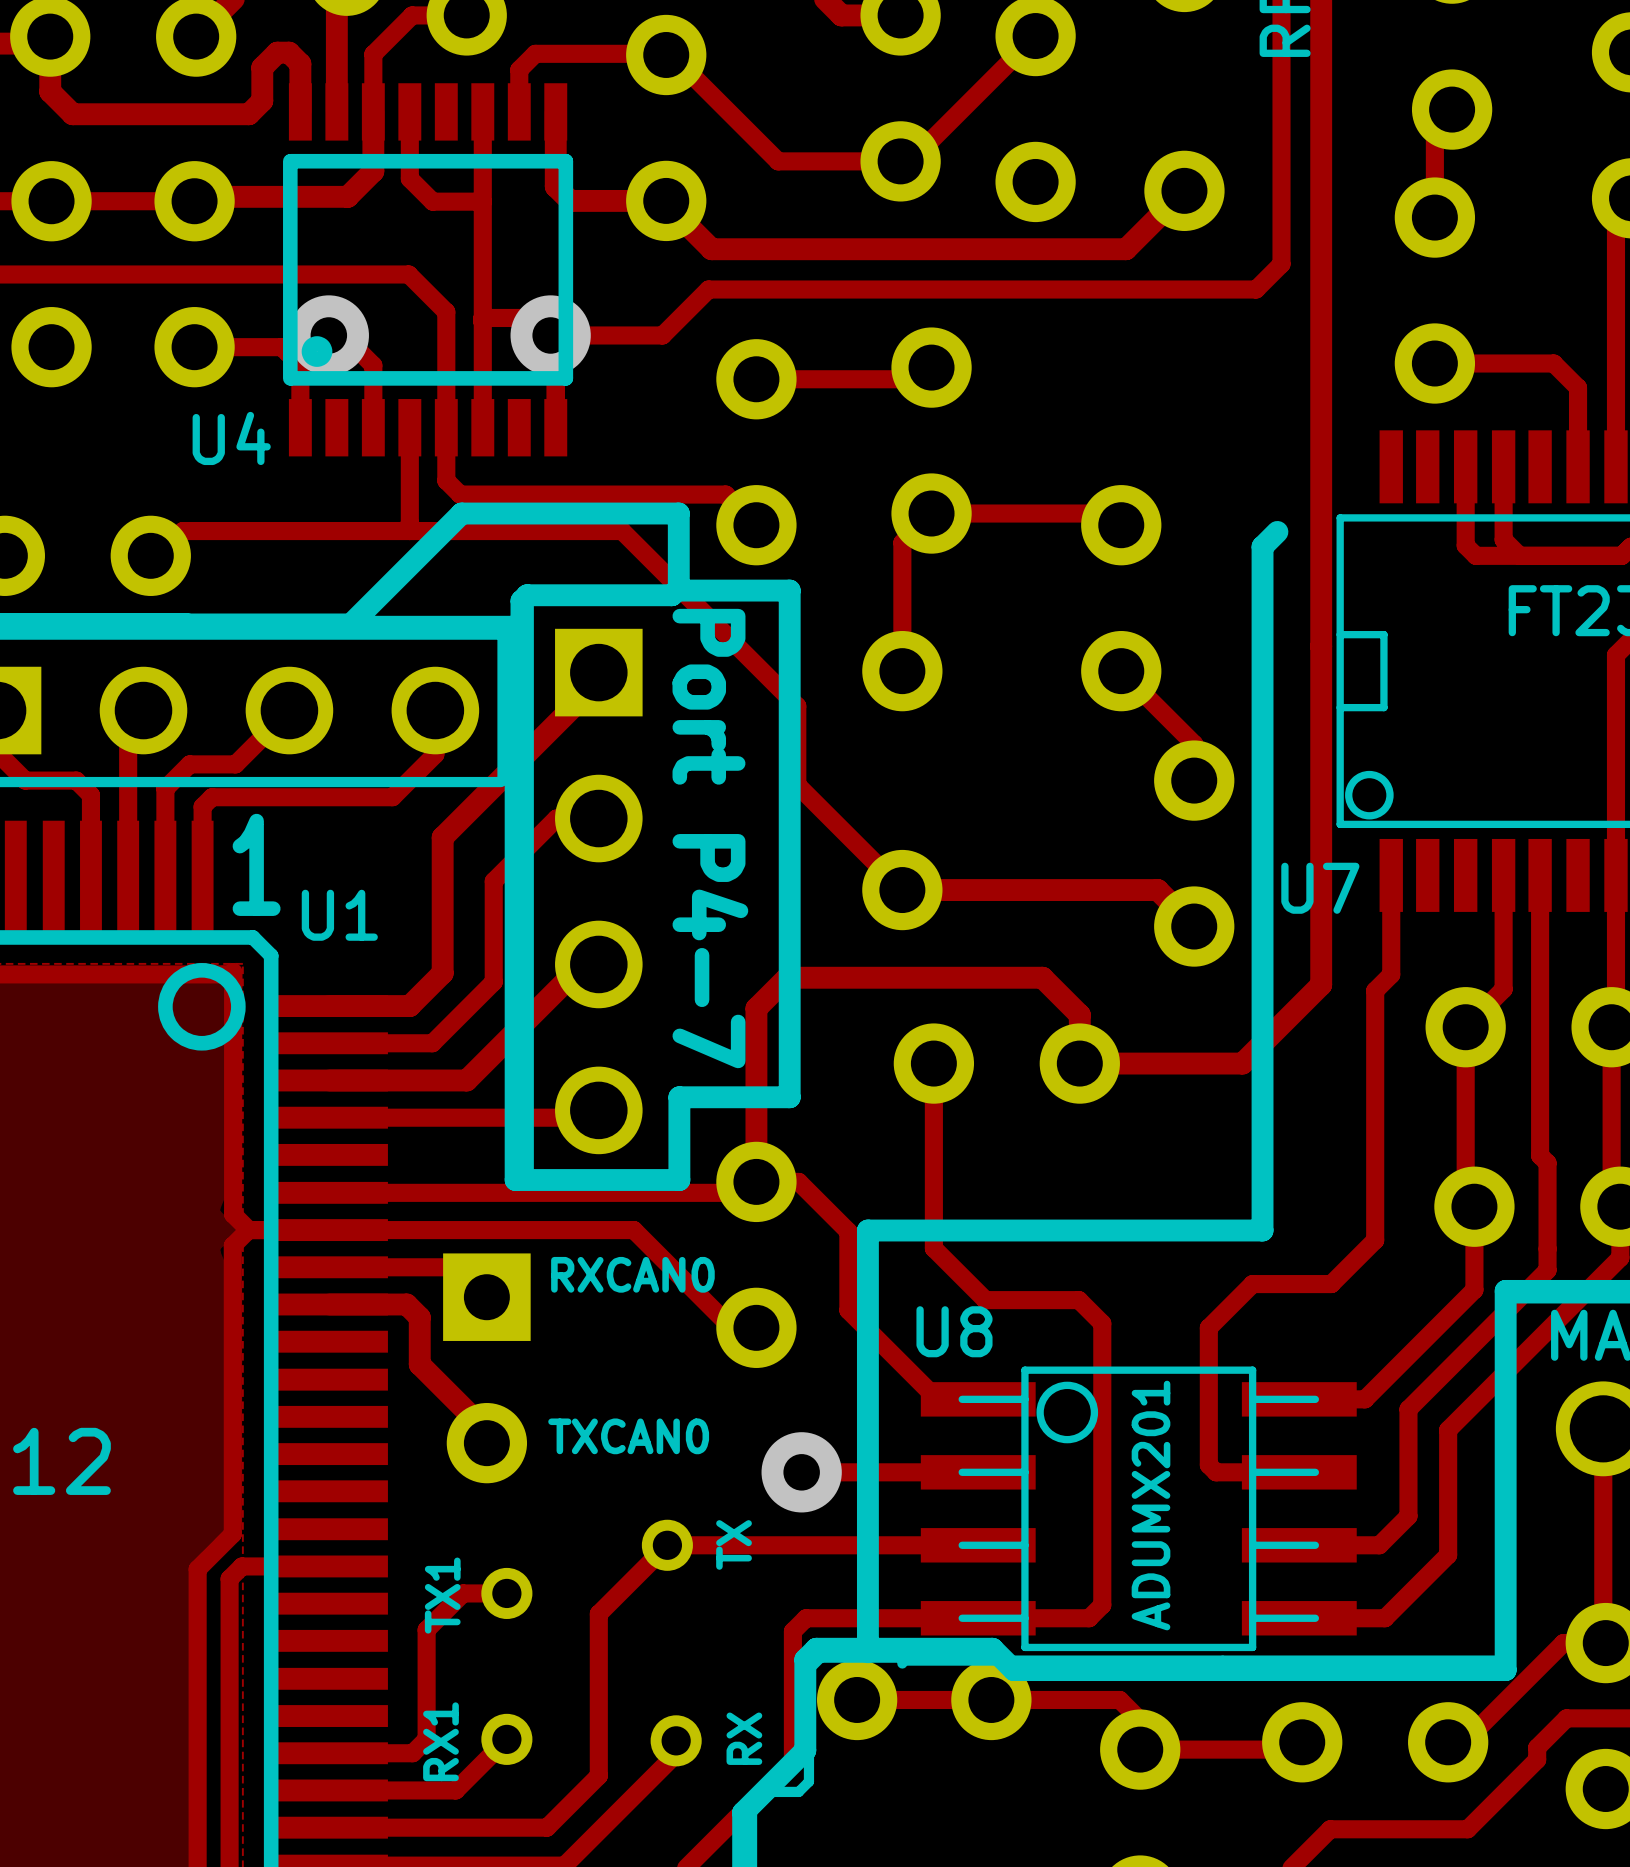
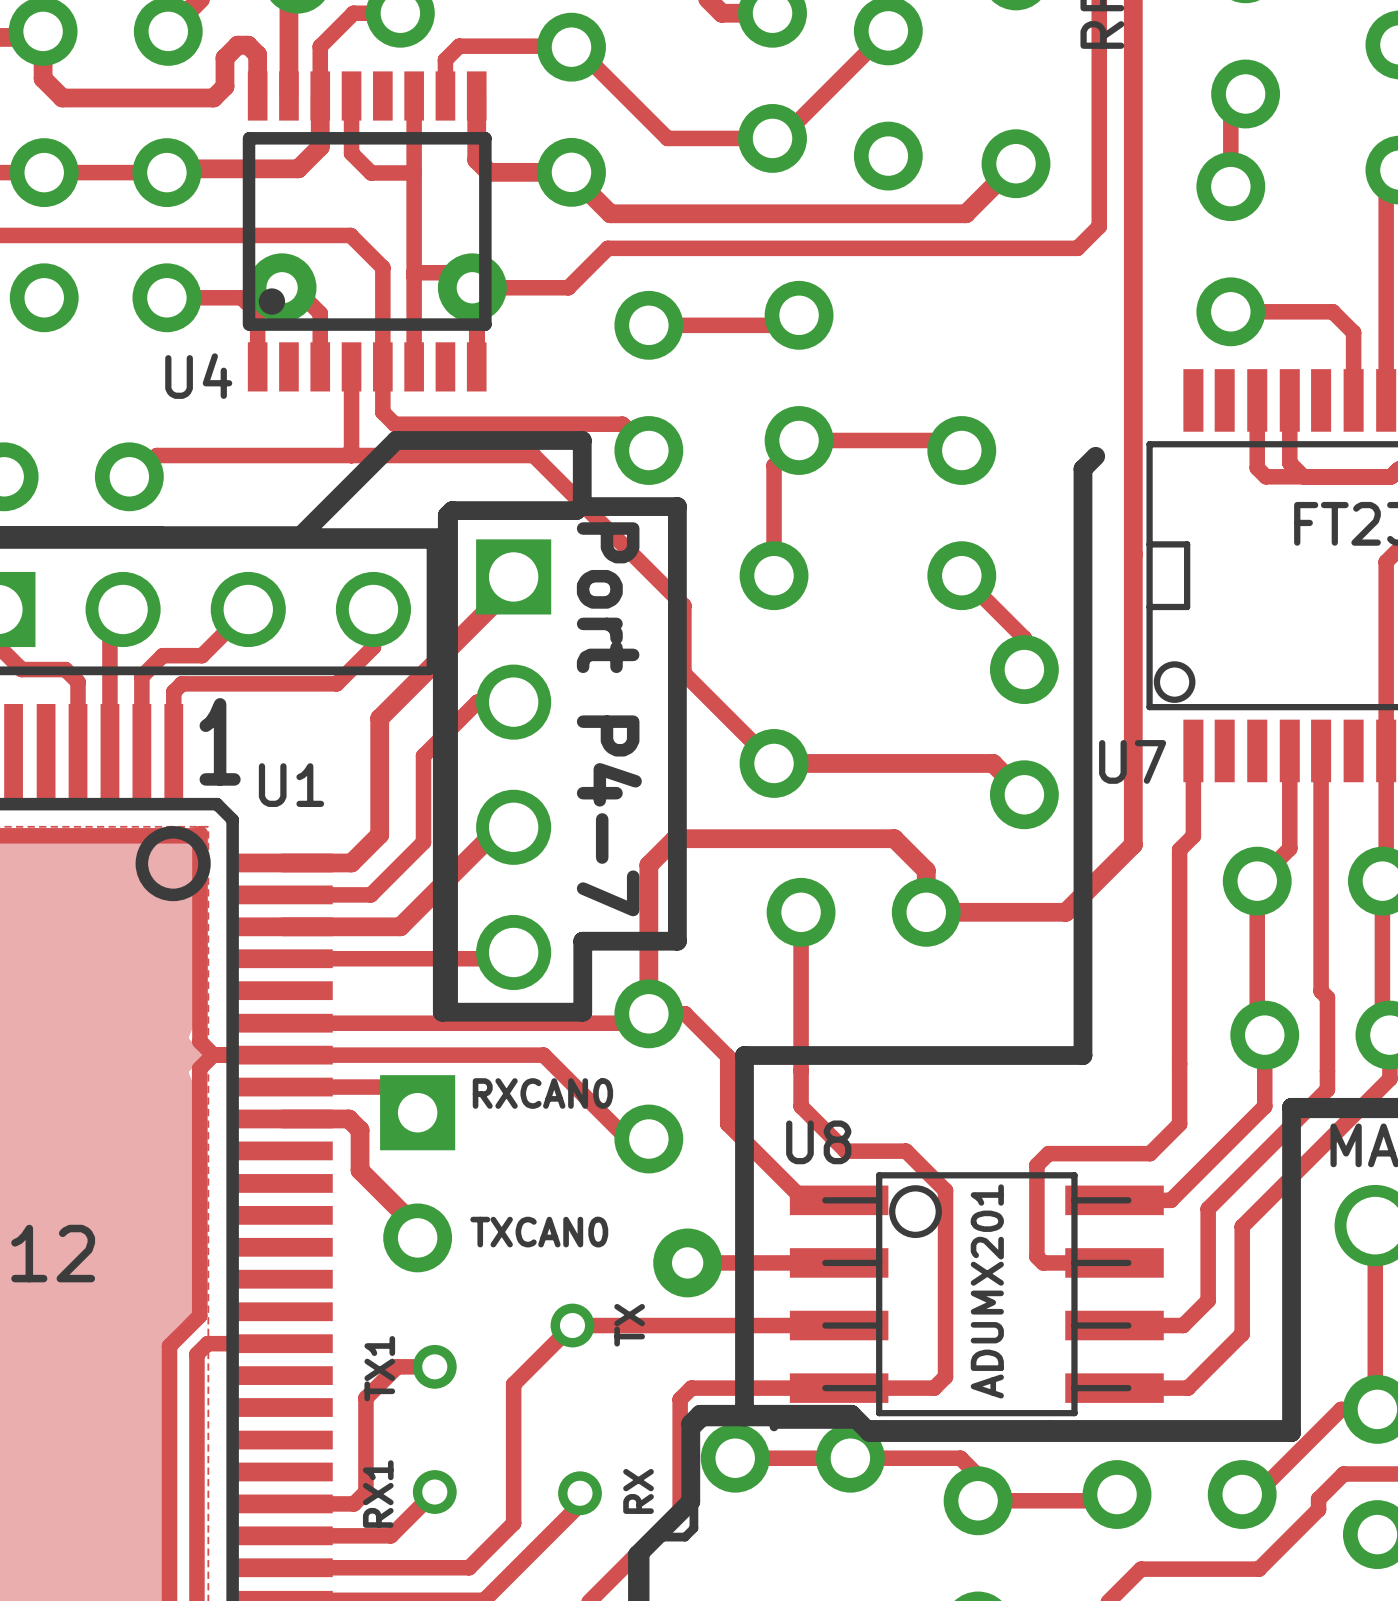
track: (1375, 1240) (1331, 1284) (1252, 1284) (1208, 1327) (1208, 1358) -> (1179, 1063) (1179, 1124) (1150, 1153) (1048, 1153) (1036, 1165)
track: (933, 1248) (985, 1300) (1078, 1300) (1102, 1323) (1102, 1387) -> (801, 1070) (801, 1106) (845, 1151) (906, 1151) (945, 1190)

